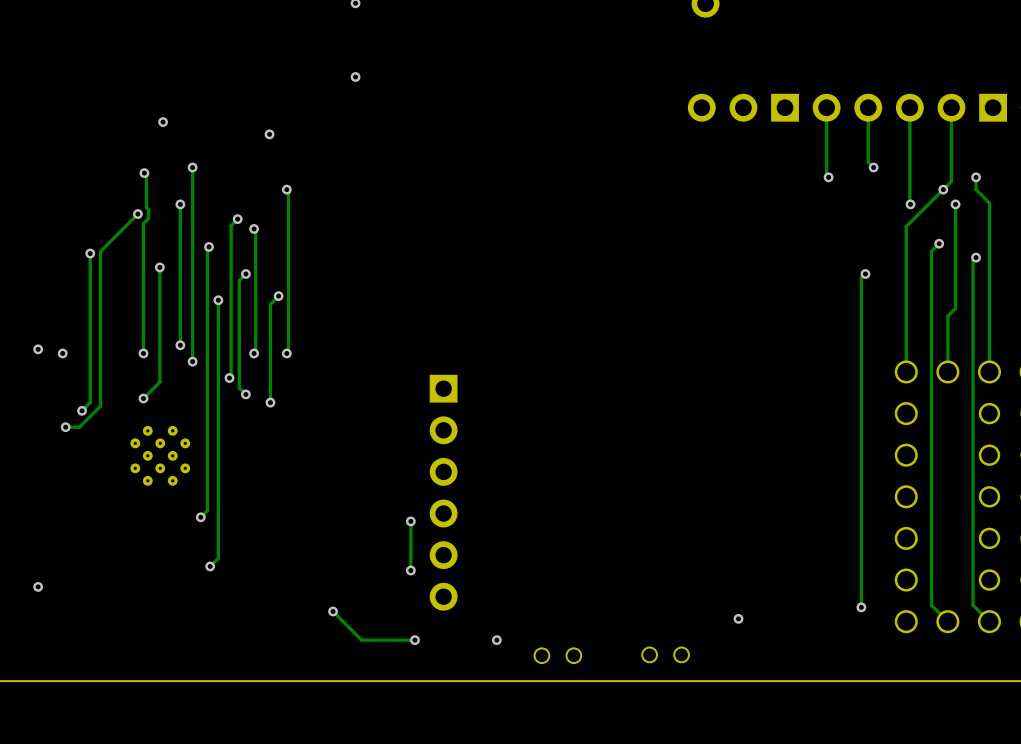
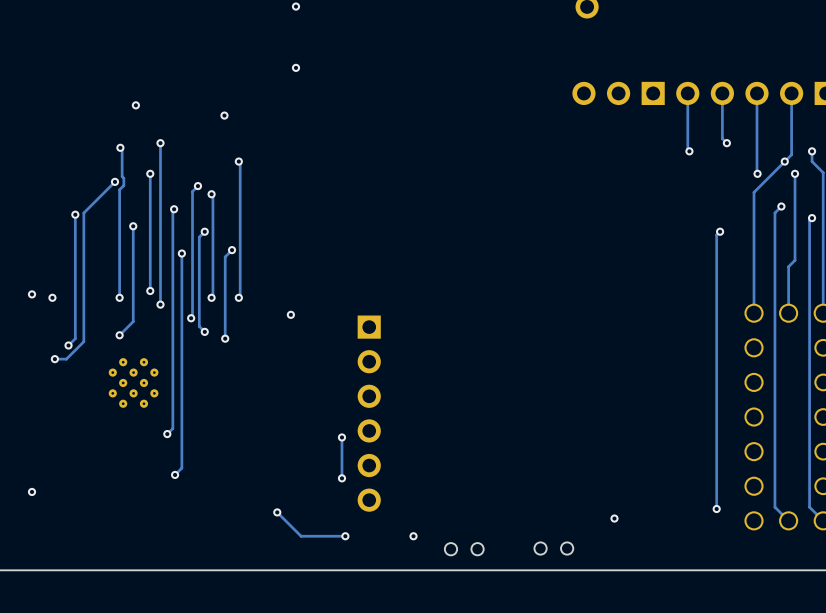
via: none -> (290, 314)

